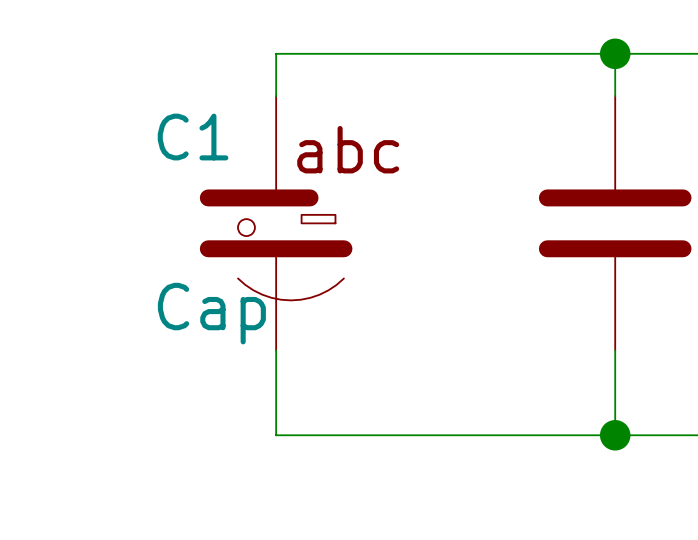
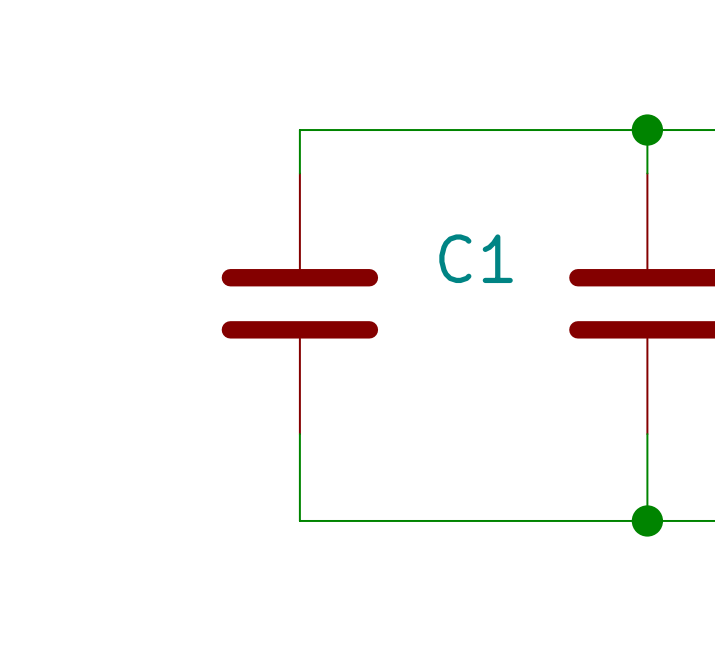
C1 symbol: [199, 96, 353, 351] -> [221, 173, 379, 435]
C1 name position: C1 (193, 137) -> C1 (476, 258)
C1 value: Cap (211, 313) -> none

